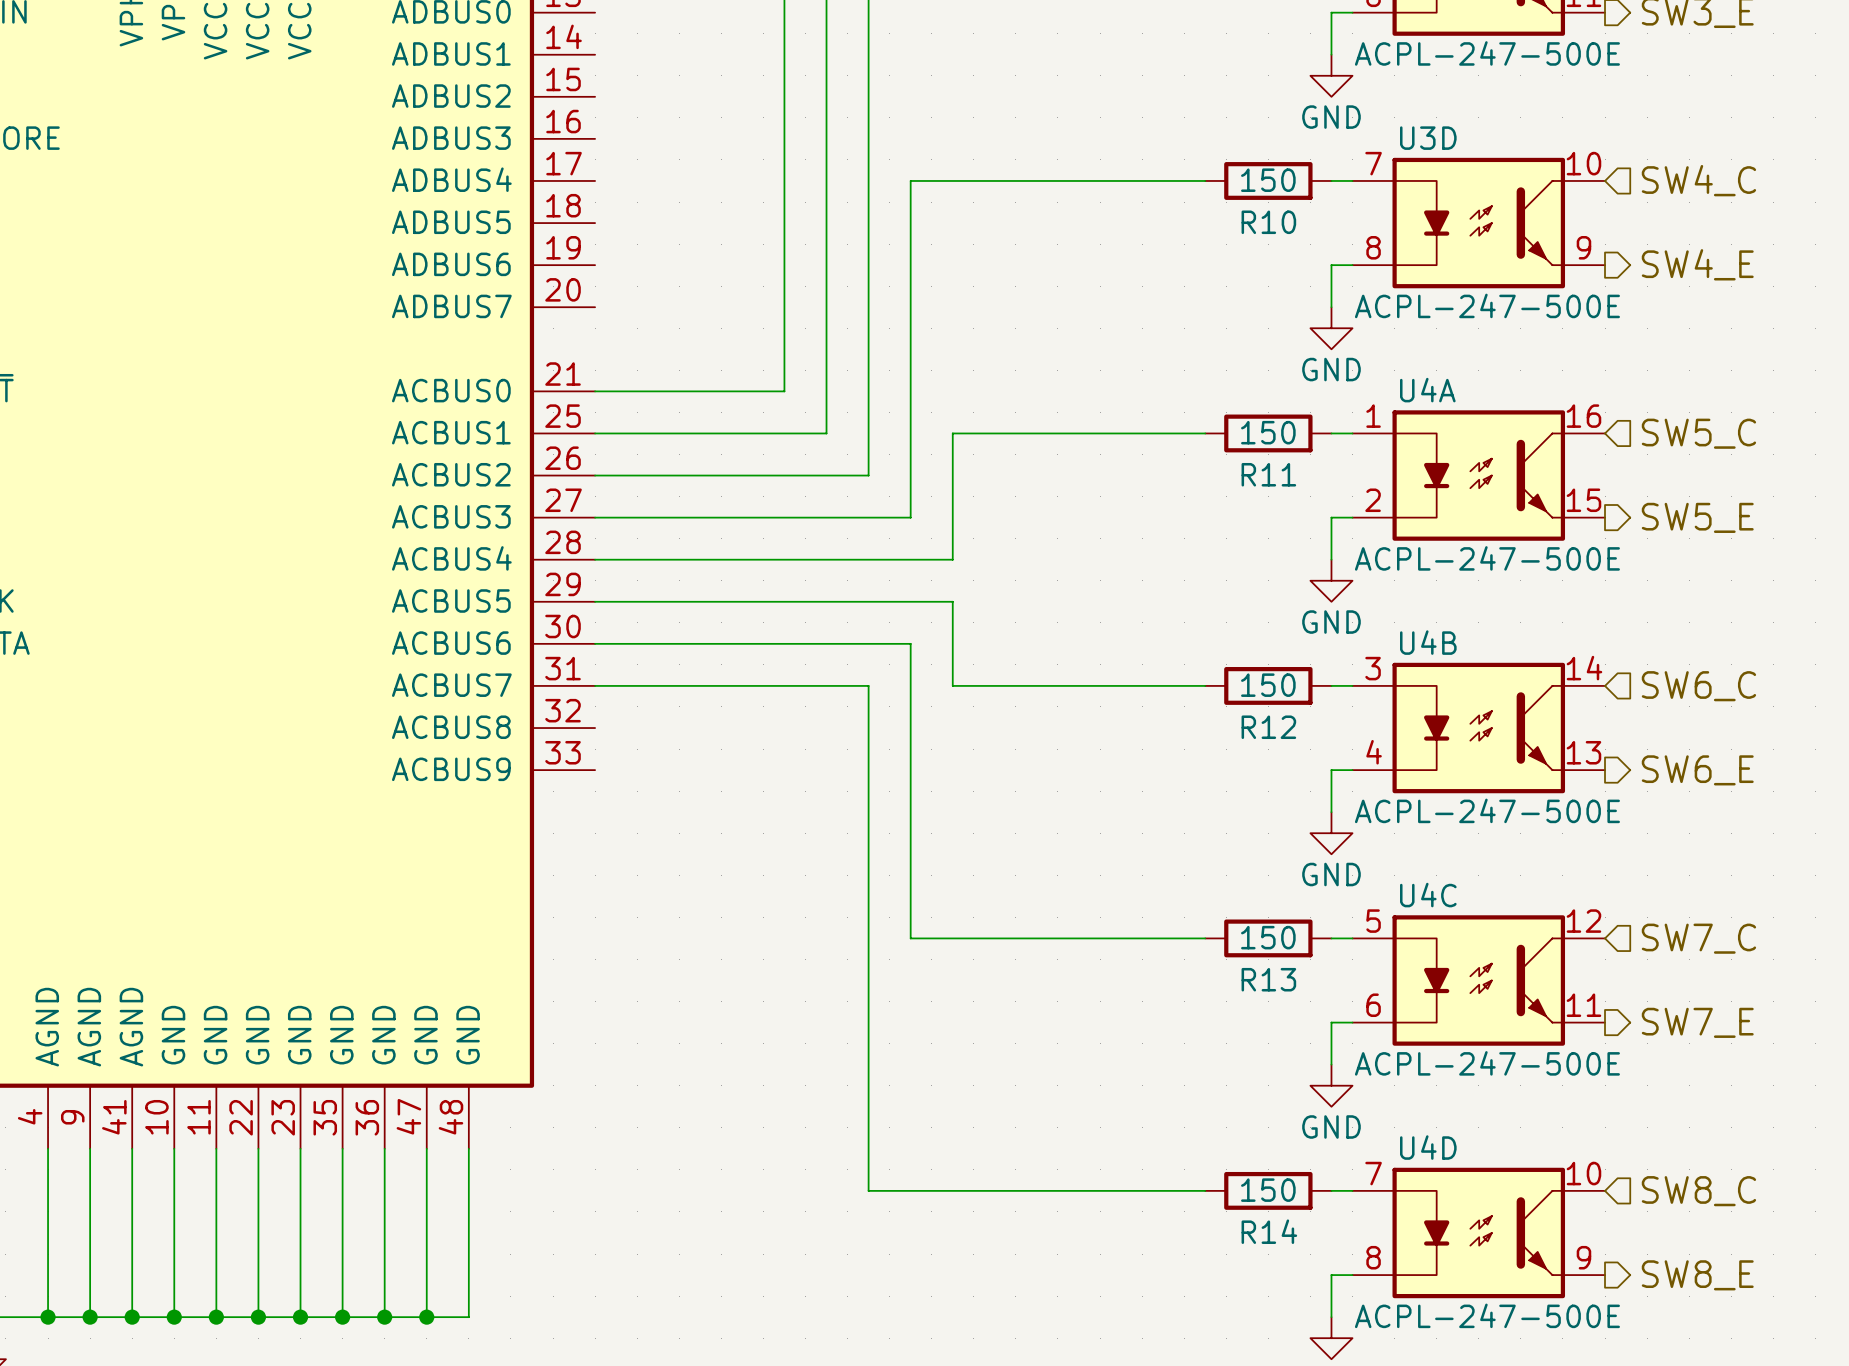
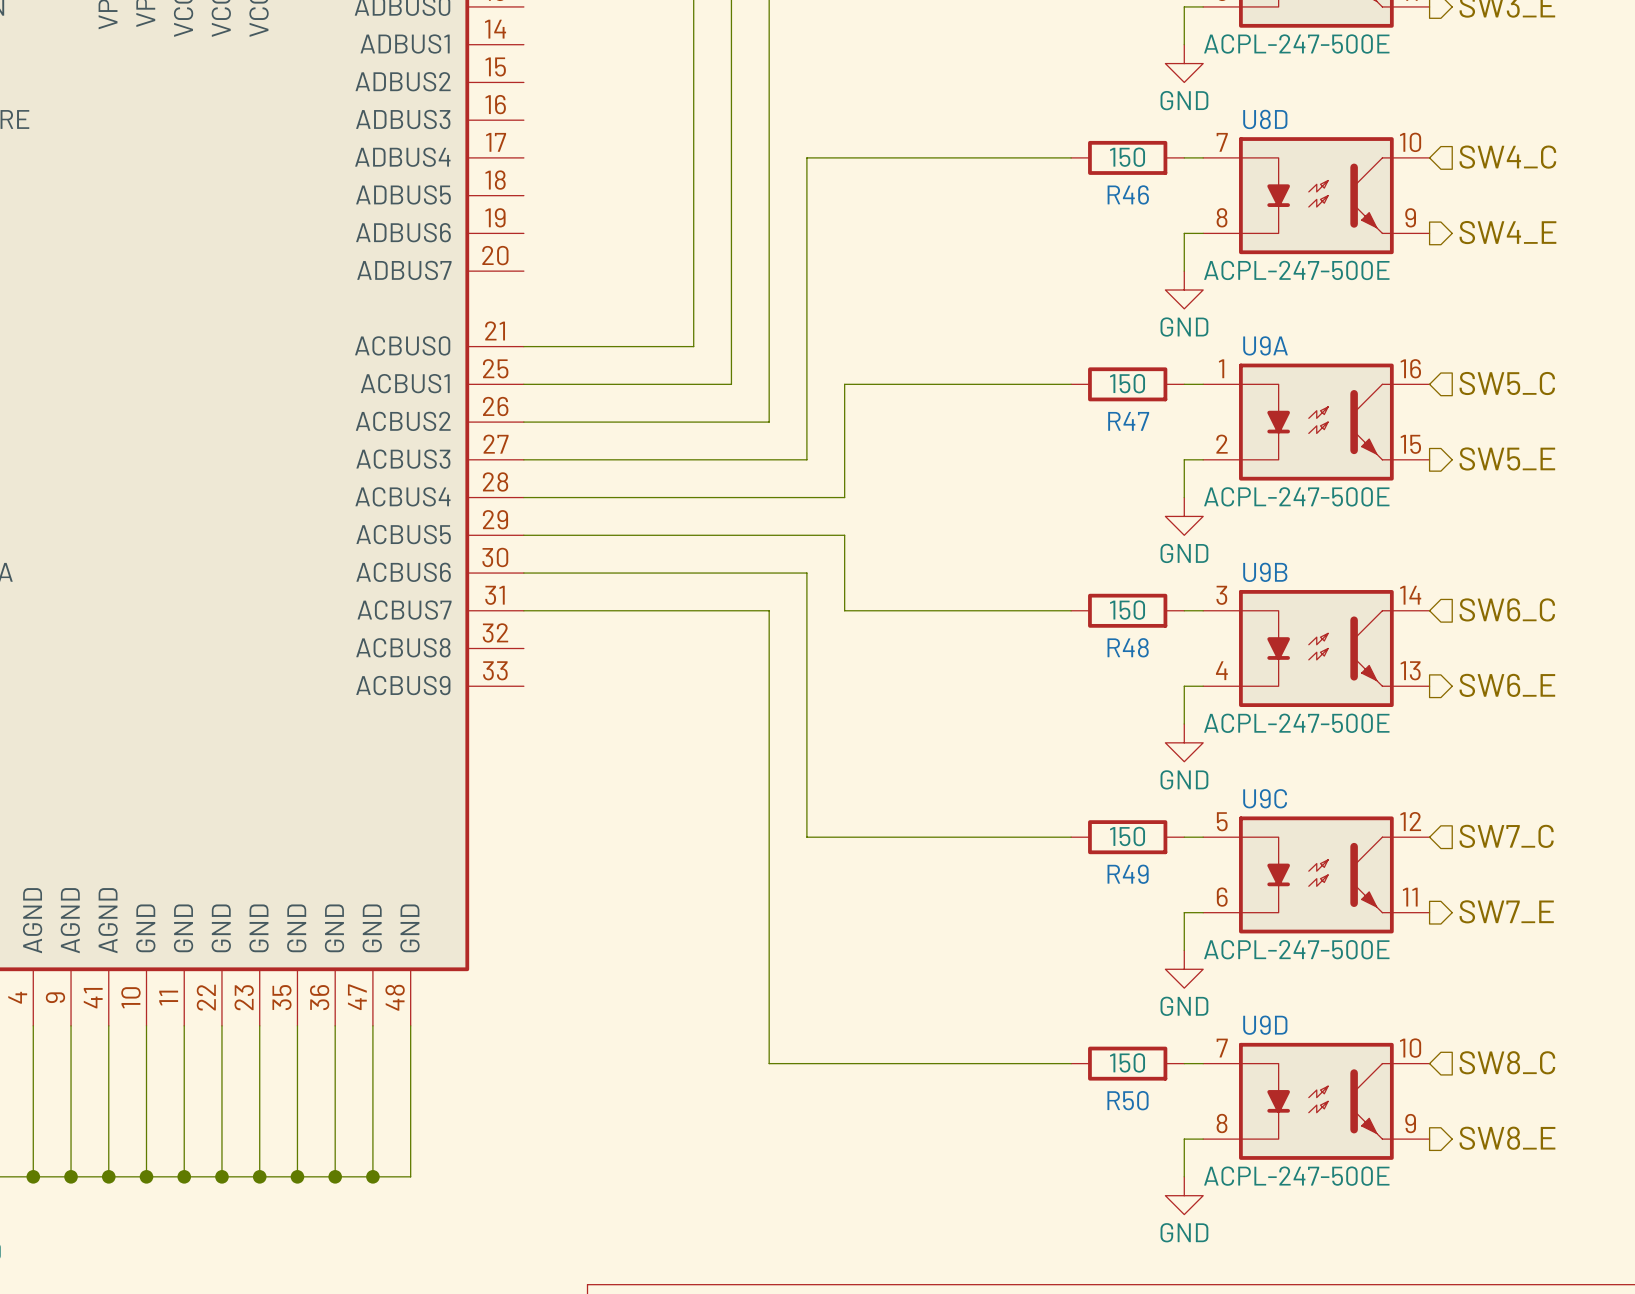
U3D name: U3D (1428, 138) -> U8D (1265, 119)
R10 name: R10 (1268, 222) -> R46 (1128, 194)
U4A name: U4A (1427, 390) -> U9A (1265, 345)
R11 name: R11 (1268, 474) -> R47 (1128, 421)
U4B name: U4B (1428, 642) -> U9B (1265, 572)
R12 name: R12 (1268, 727) -> R48 (1128, 647)
U4C name: U4C (1428, 895) -> U9C (1265, 798)
R13 name: R13 (1268, 979) -> R49 (1128, 874)
U4D name: U4D (1428, 1147) -> U9D (1265, 1025)
R14 name: R14 (1269, 1231) -> R50 (1127, 1100)

